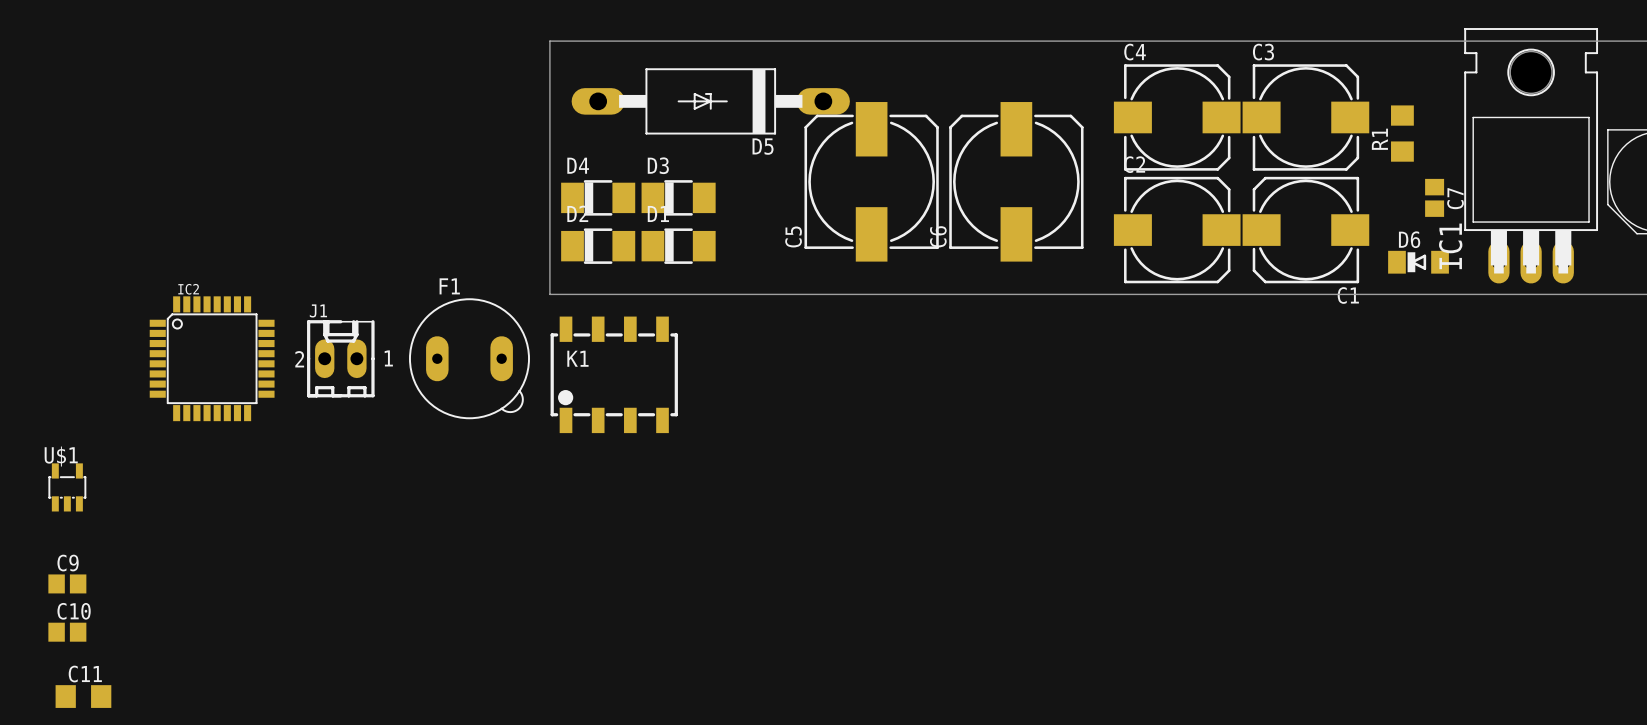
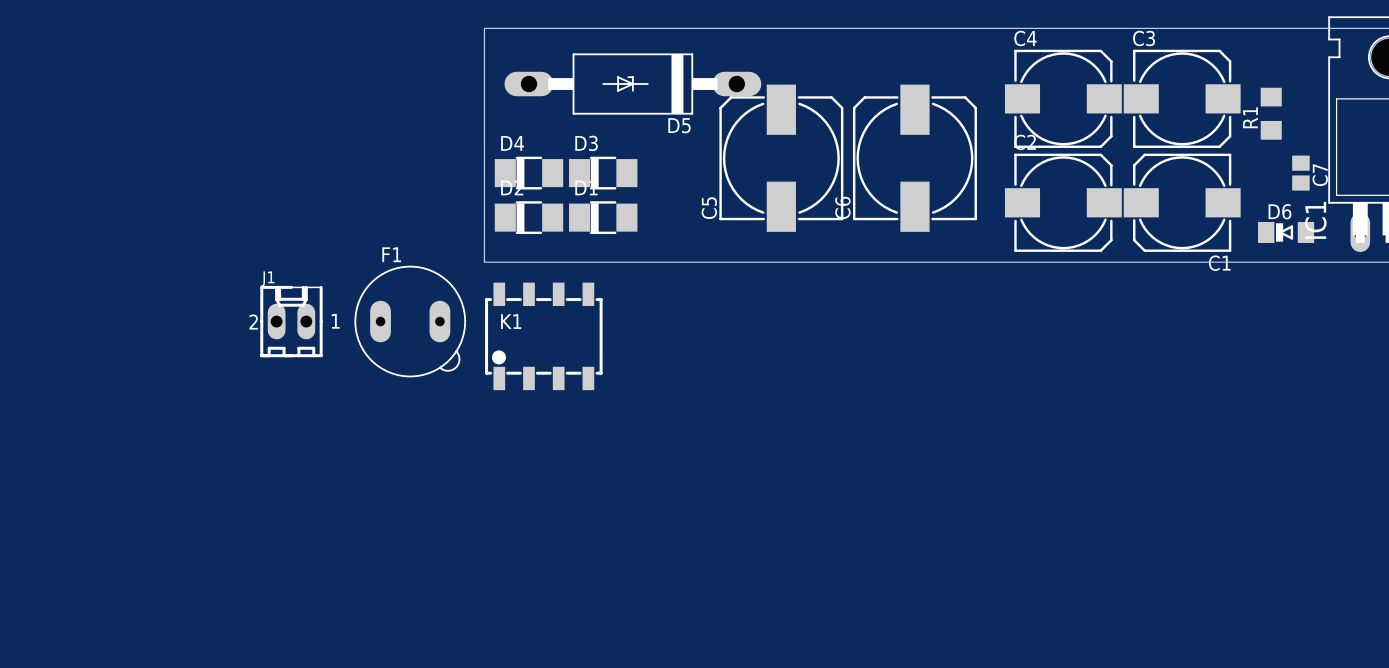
IC2: (212, 358) -> none
U$1: (67, 487) -> none
C9: (67, 583) -> none
C10: (67, 632) -> none
C11: (83, 696) -> none

